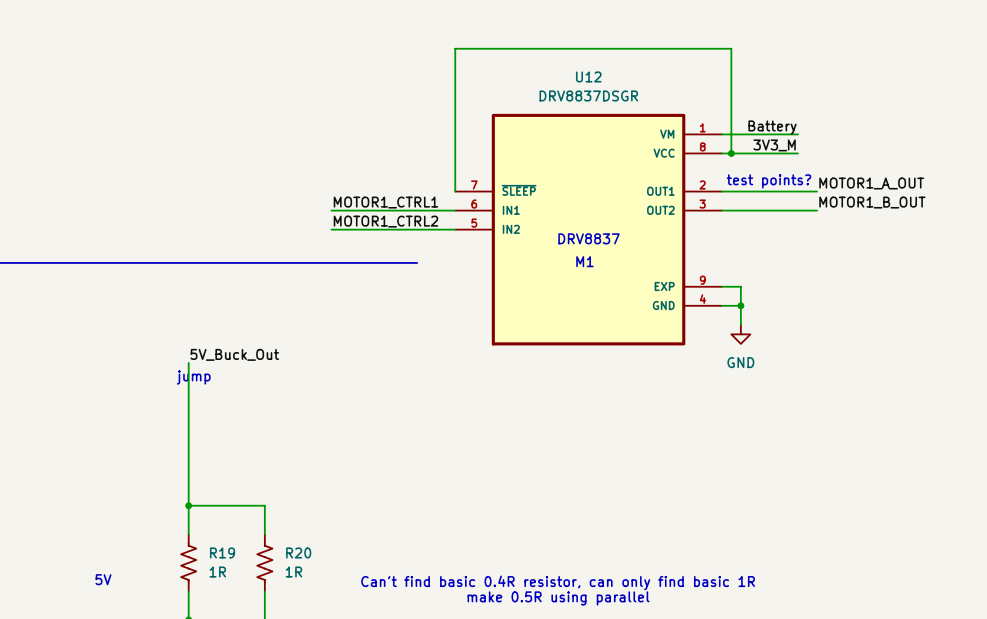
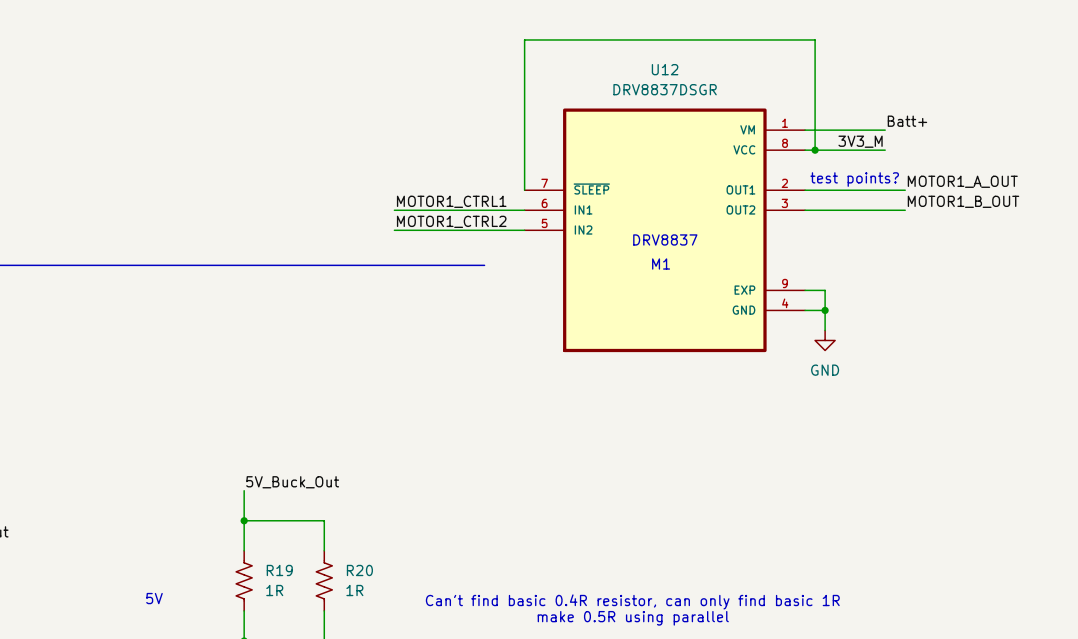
label: Battery (772, 127) -> Batt+ (907, 121)
label position: 5V_Buck_Out (234, 354) -> 5V_Buck_Out (292, 482)
wire: (188, 362) (188, 477) -> none
text: jump (193, 377) -> none

